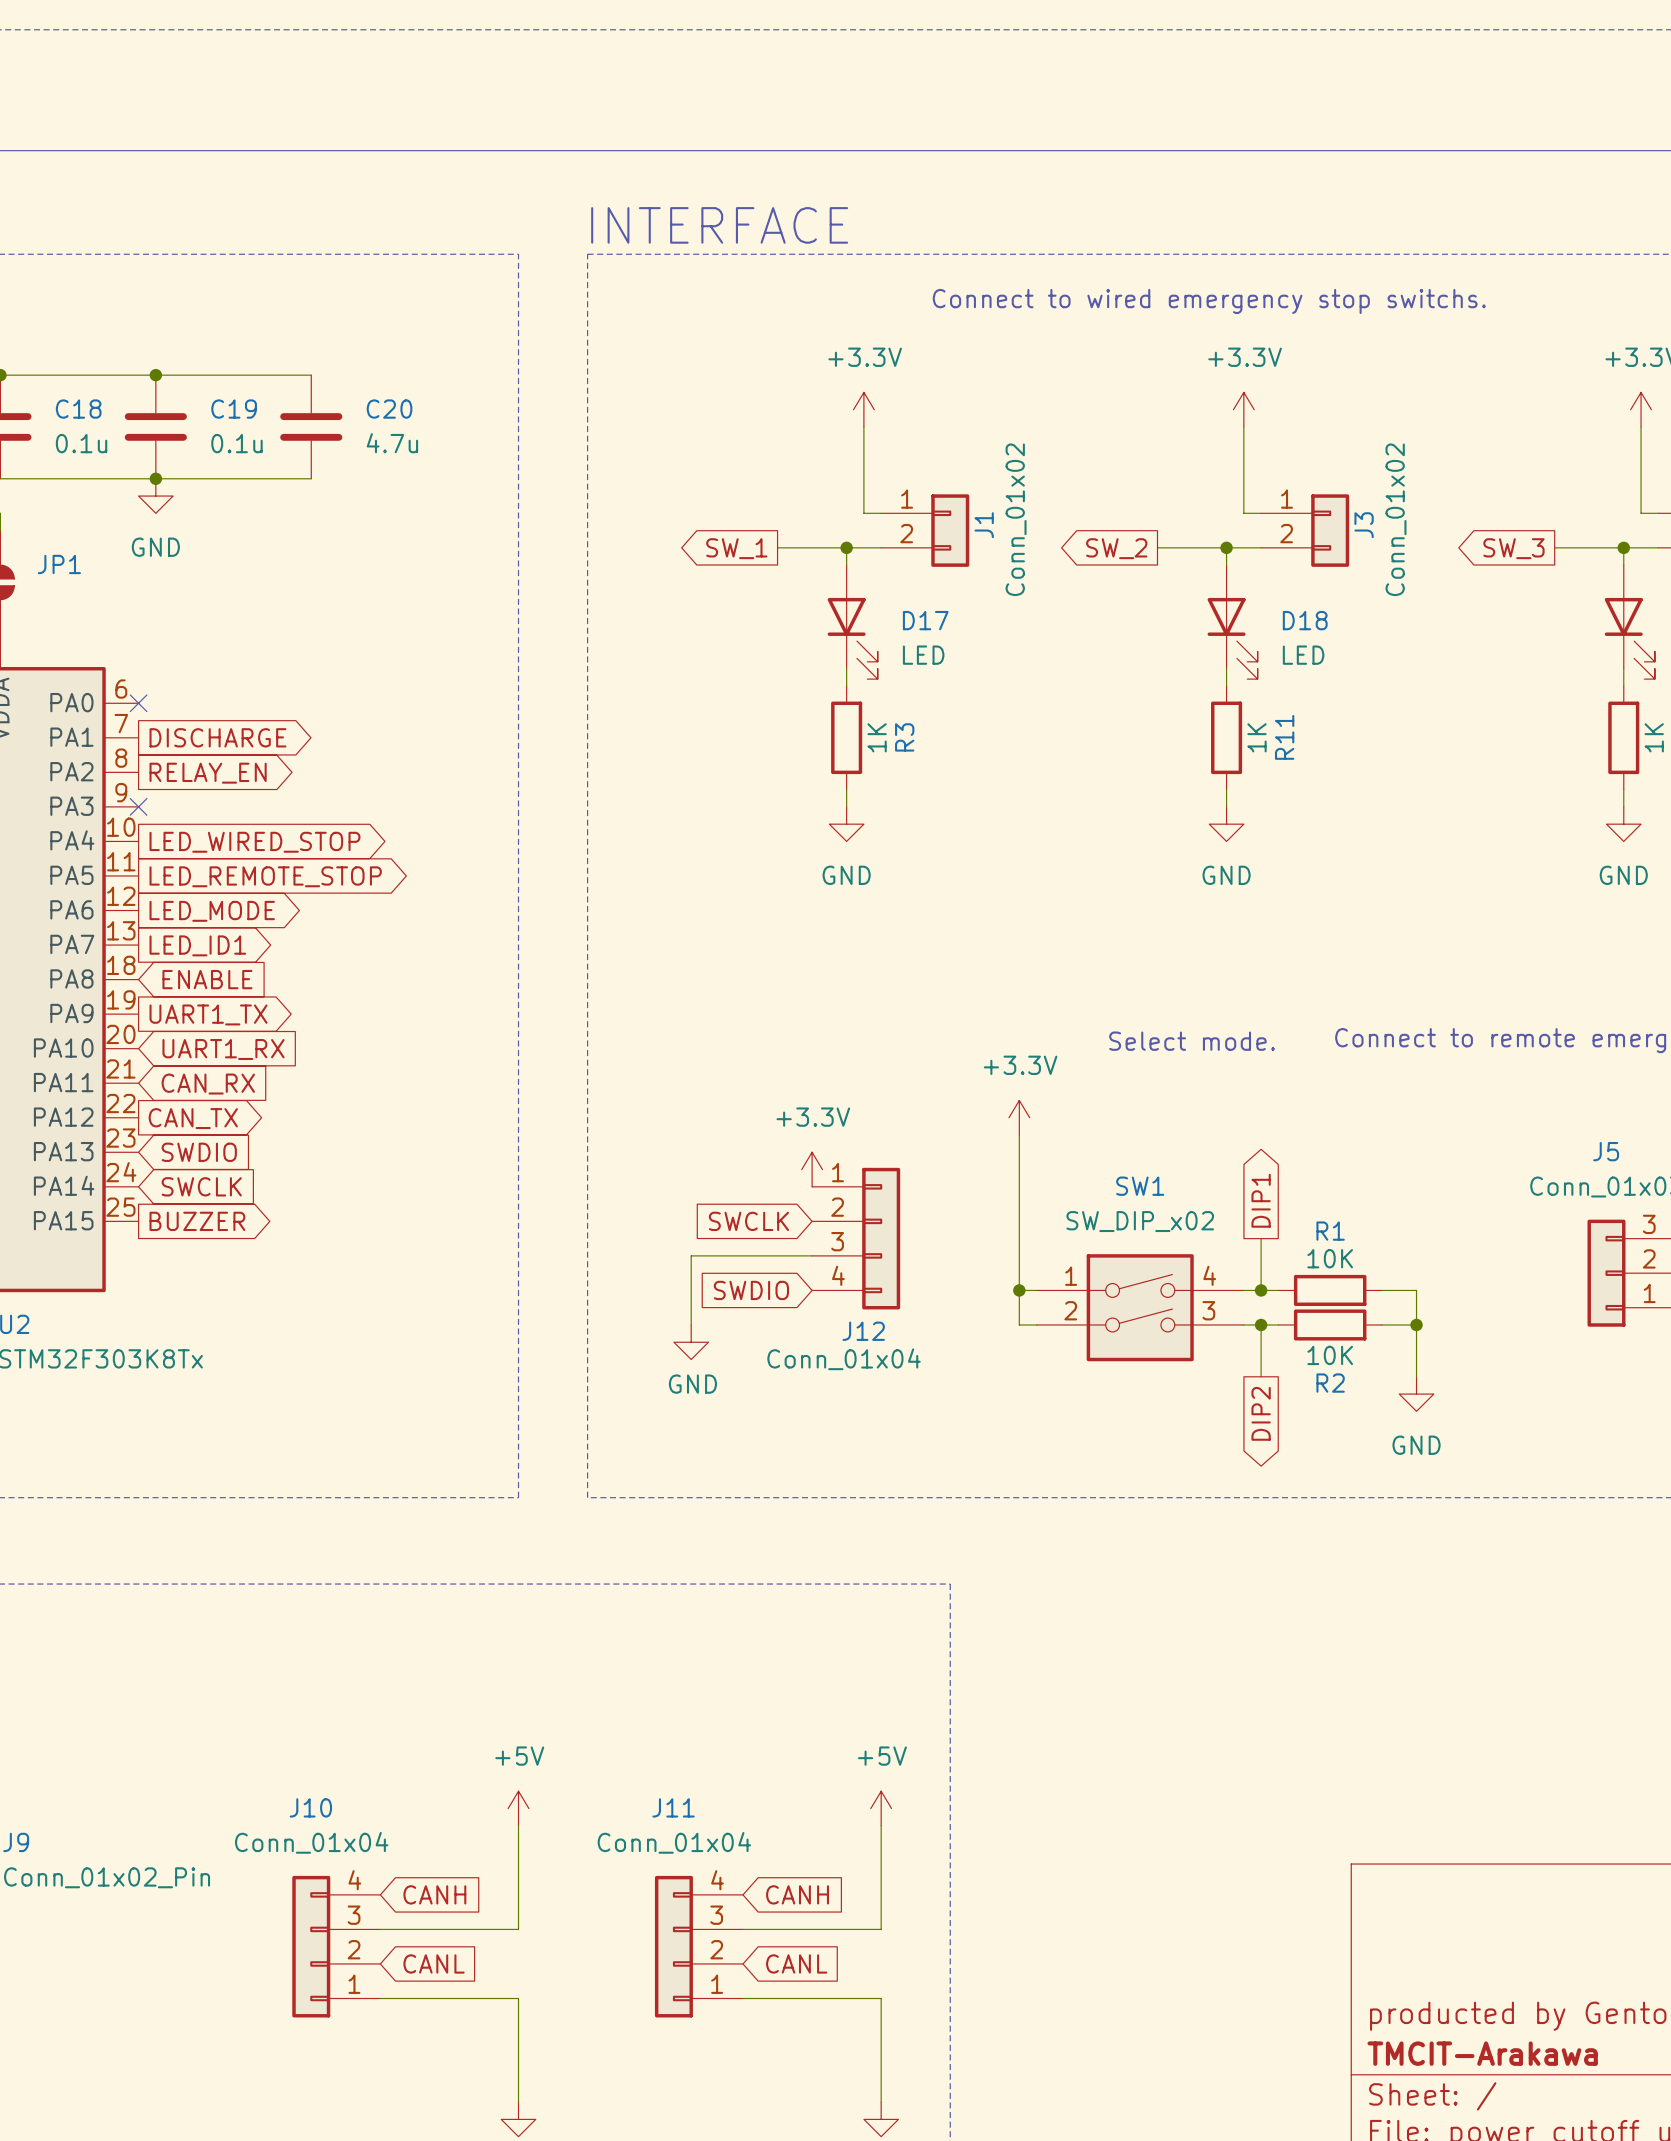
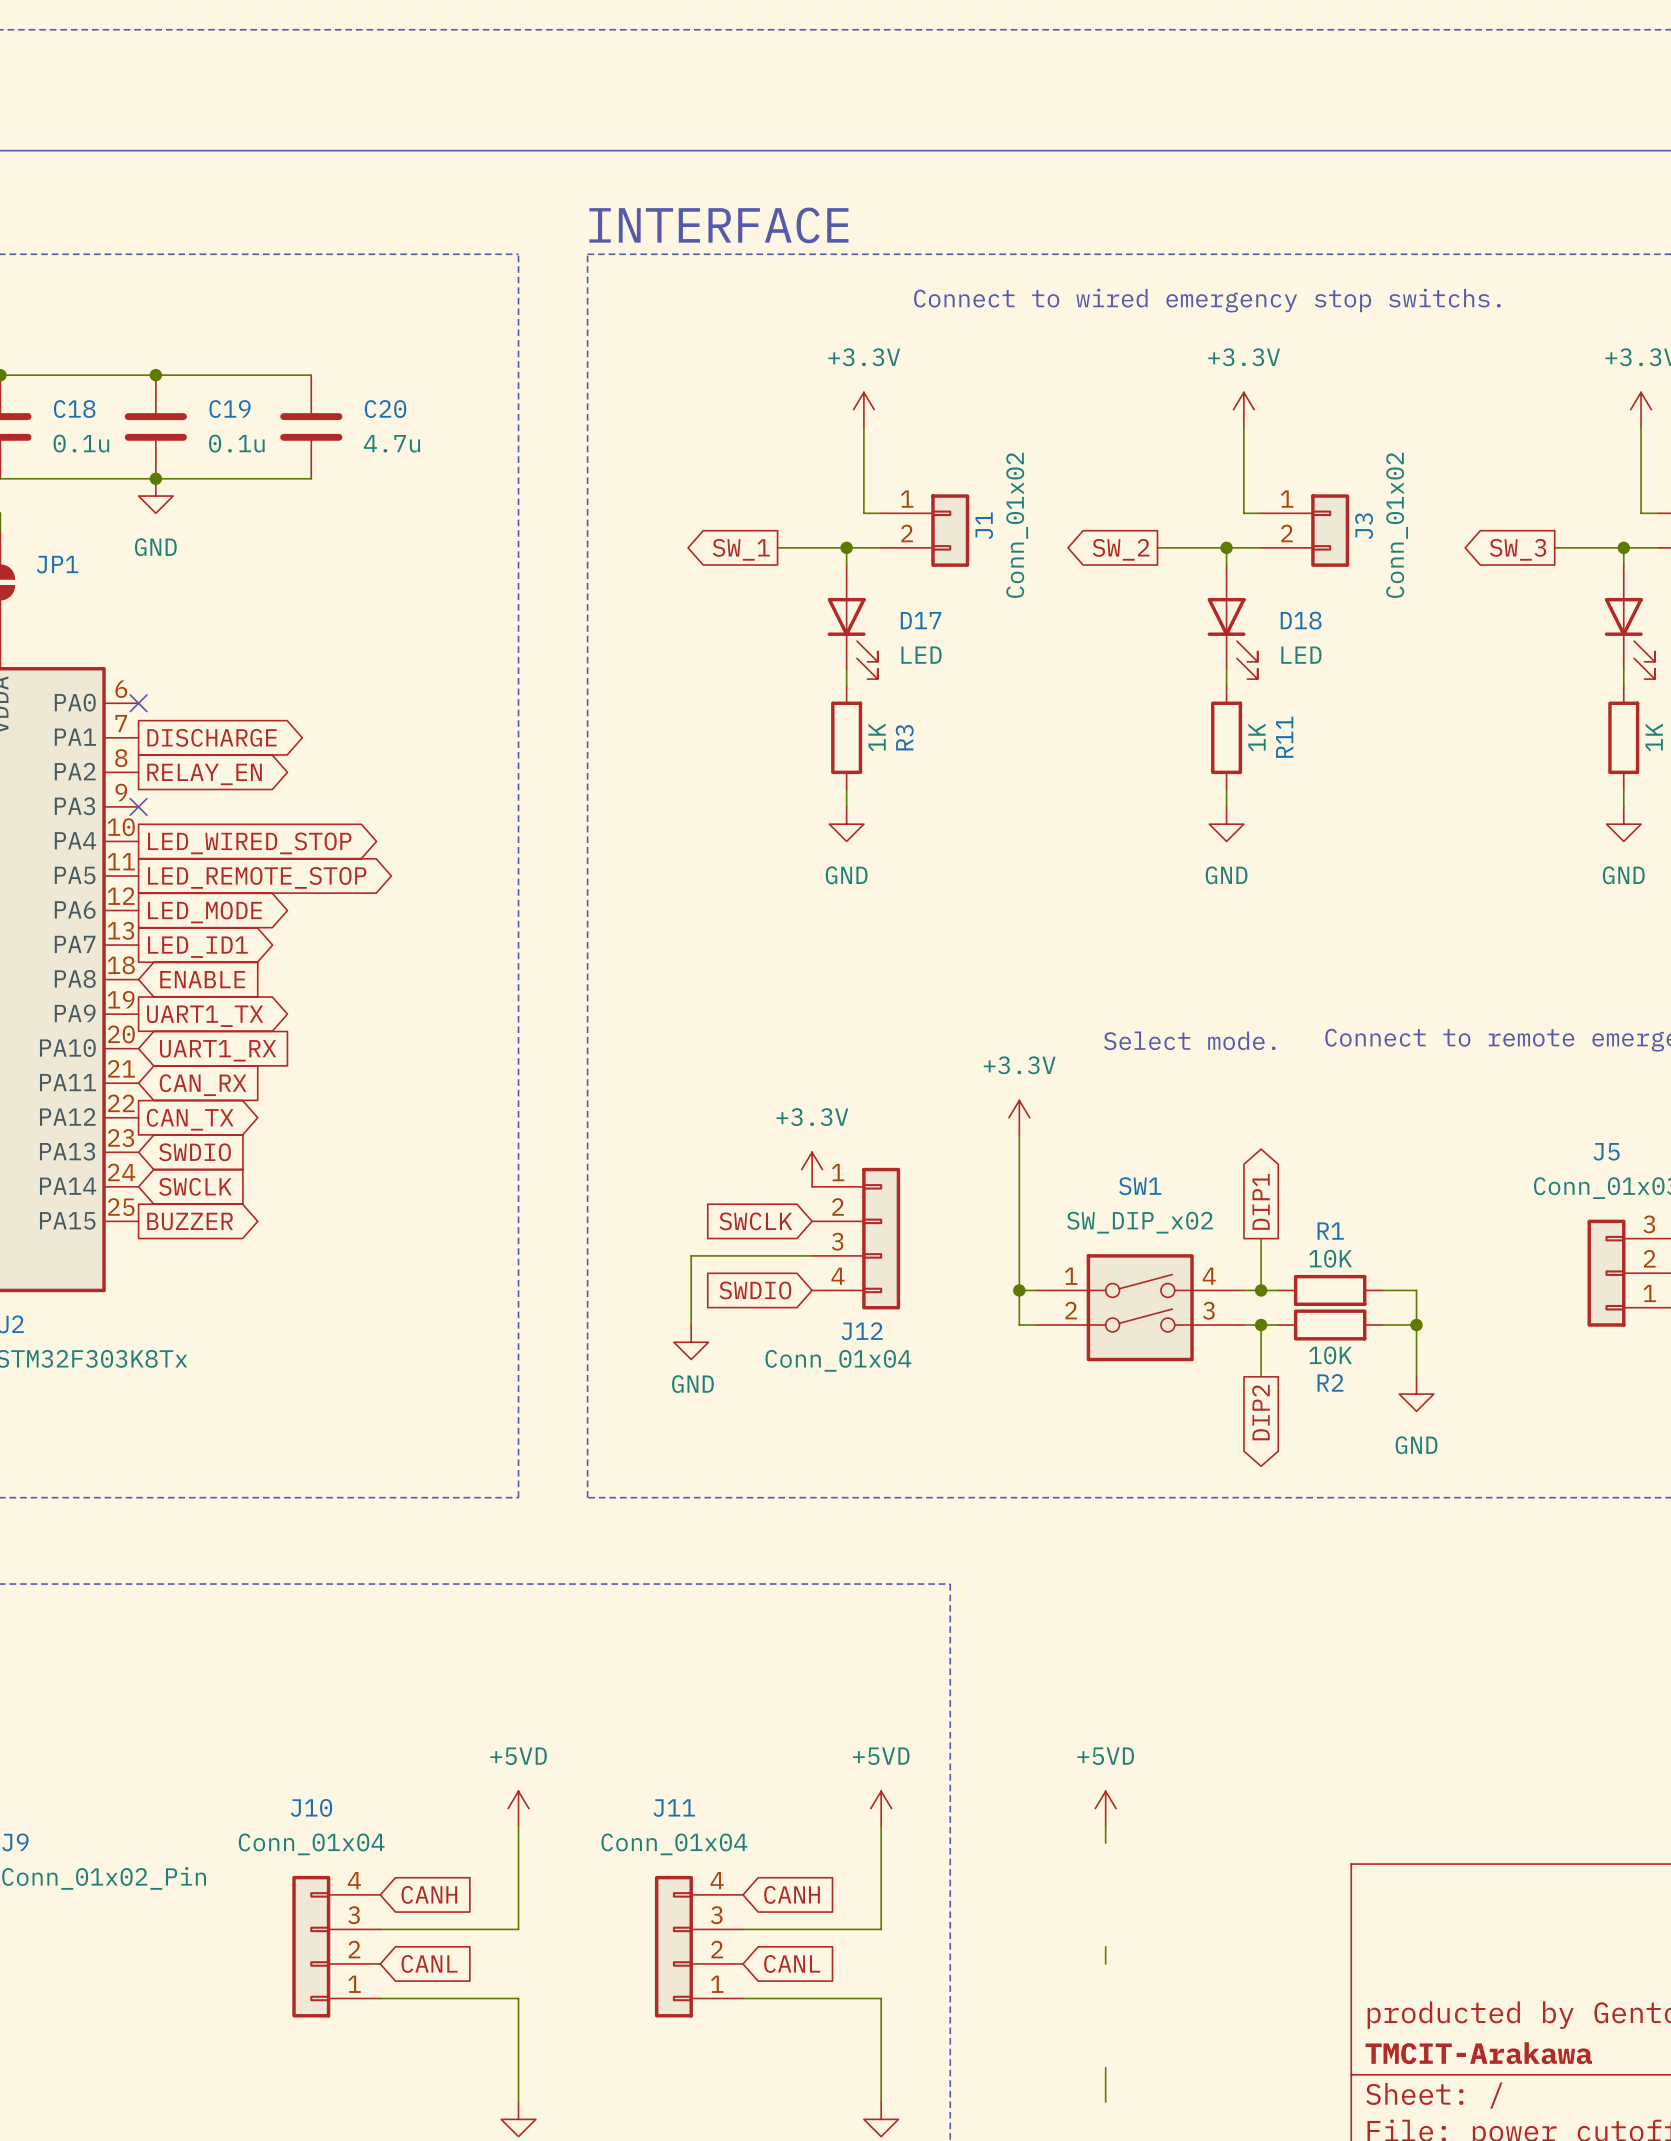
power symbol: +5V (518, 1808) -> +5VD (518, 1808)
power symbol: +5V (881, 1808) -> +5VD (881, 1808)
power symbol: none -> +5VD (1105, 1808)
wire: none -> (1105, 1825) (1105, 1843)
wire: none -> (1105, 1946) (1105, 1963)
wire: none -> (1105, 2067) (1105, 2102)

